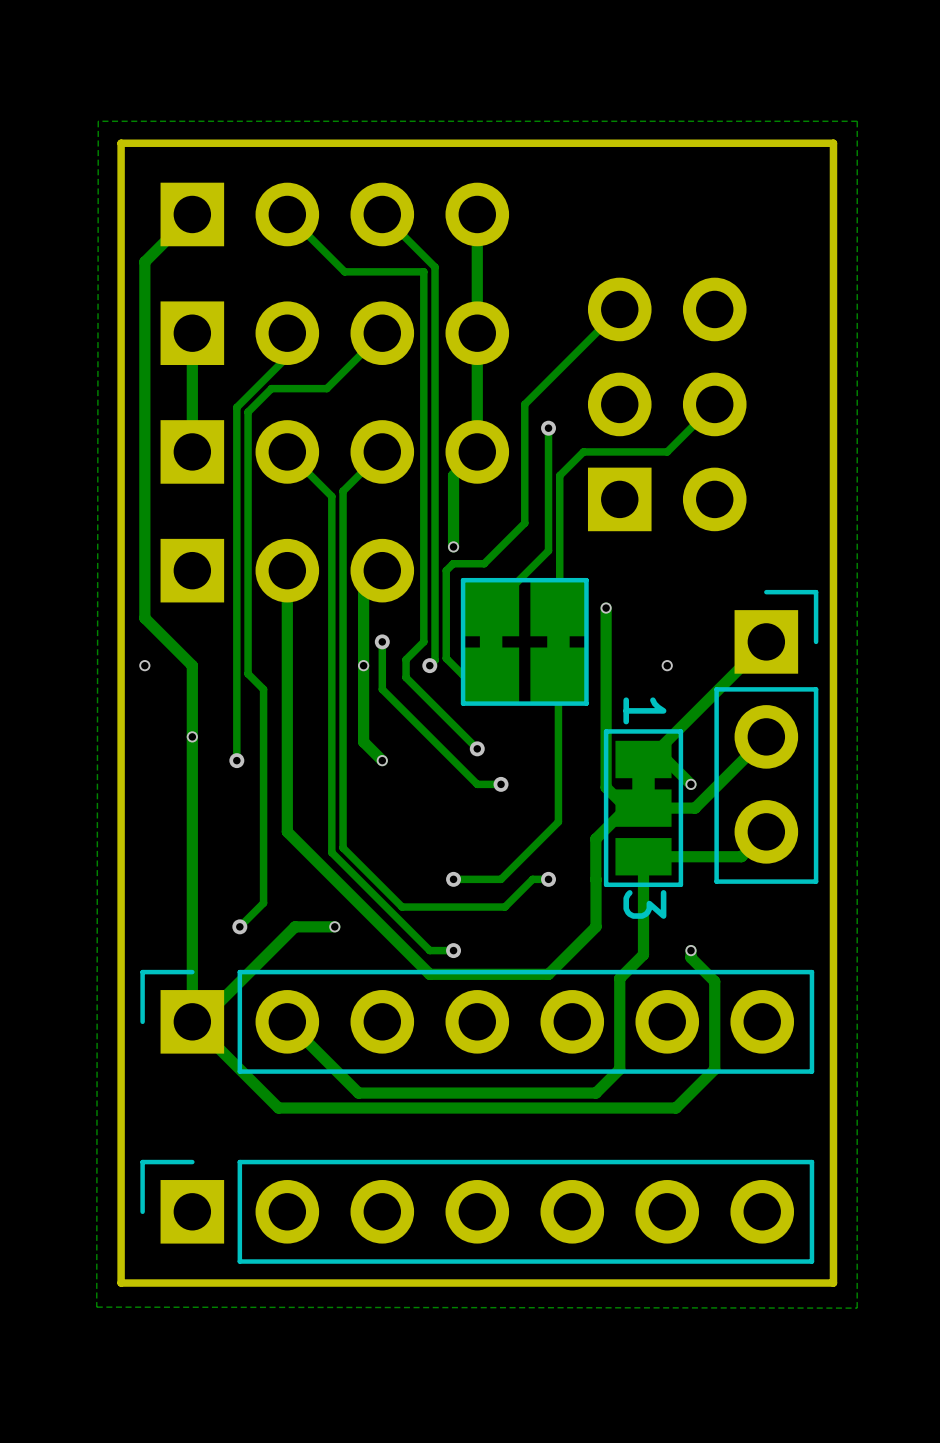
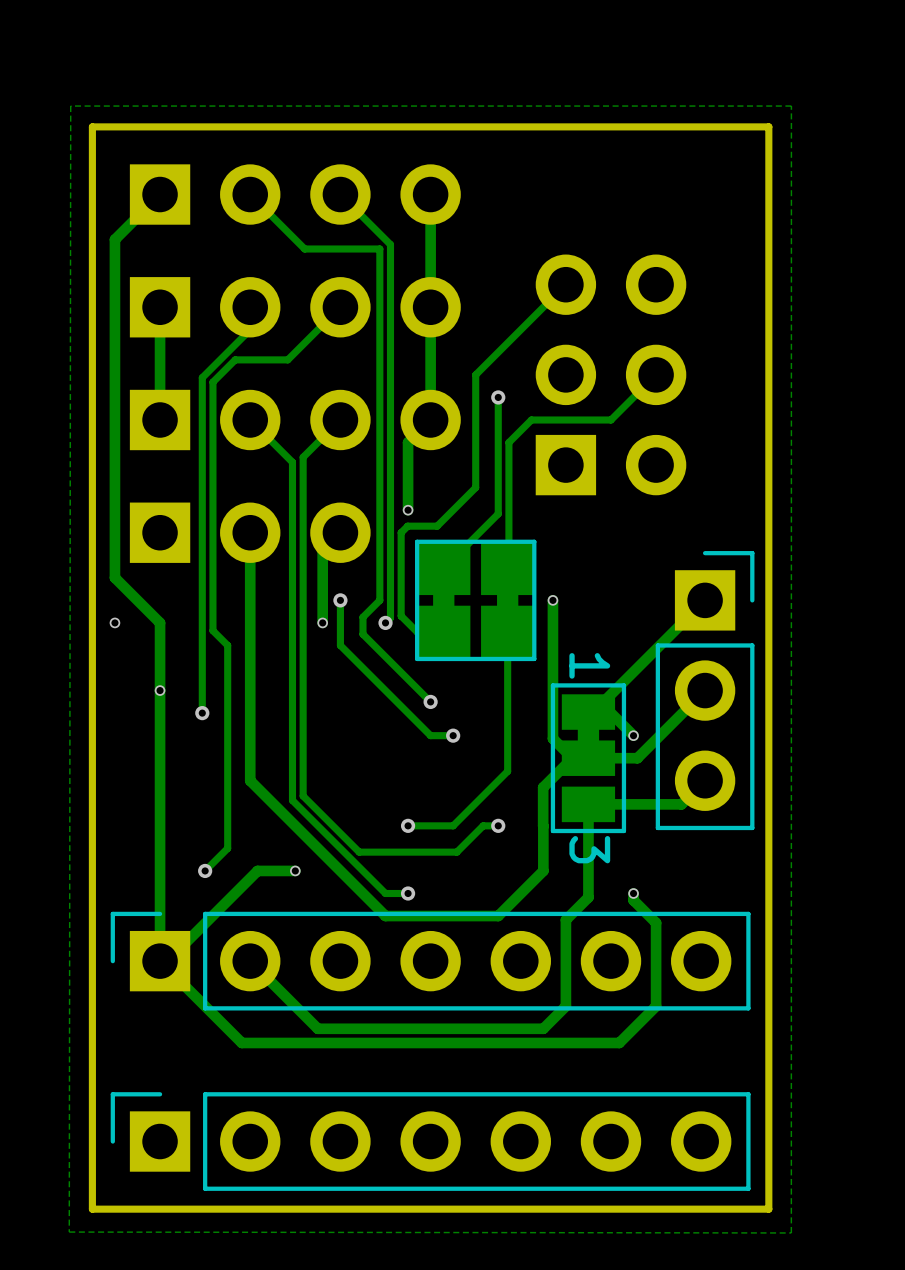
track: (606, 608) (606, 641) -> none
via: (606, 608) -> none
via: none -> (552, 600)
track: (363, 665) (363, 741) (382, 760) -> none
via: (667, 665) -> none
via: (382, 760) -> none

